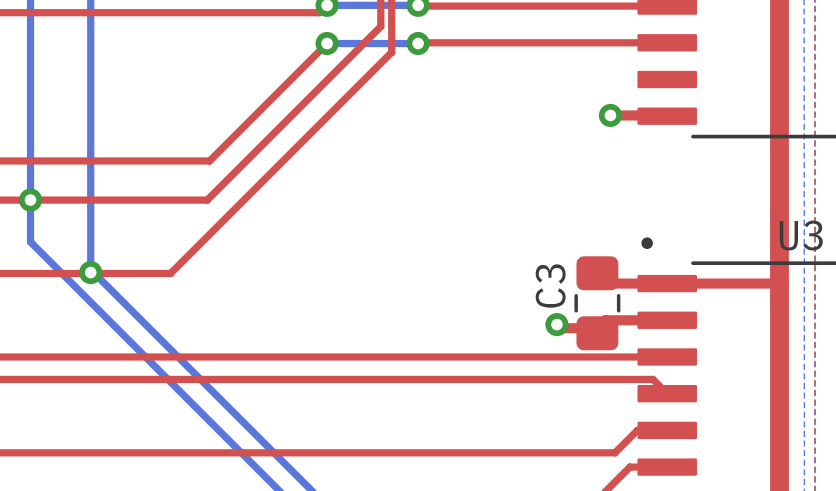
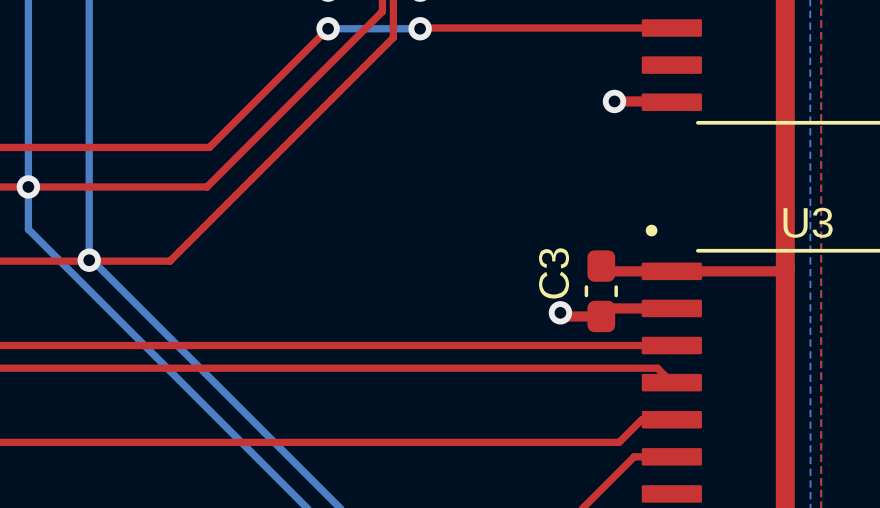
C3 footprint: [574, 256, 621, 351] -> [584, 250, 618, 333]

